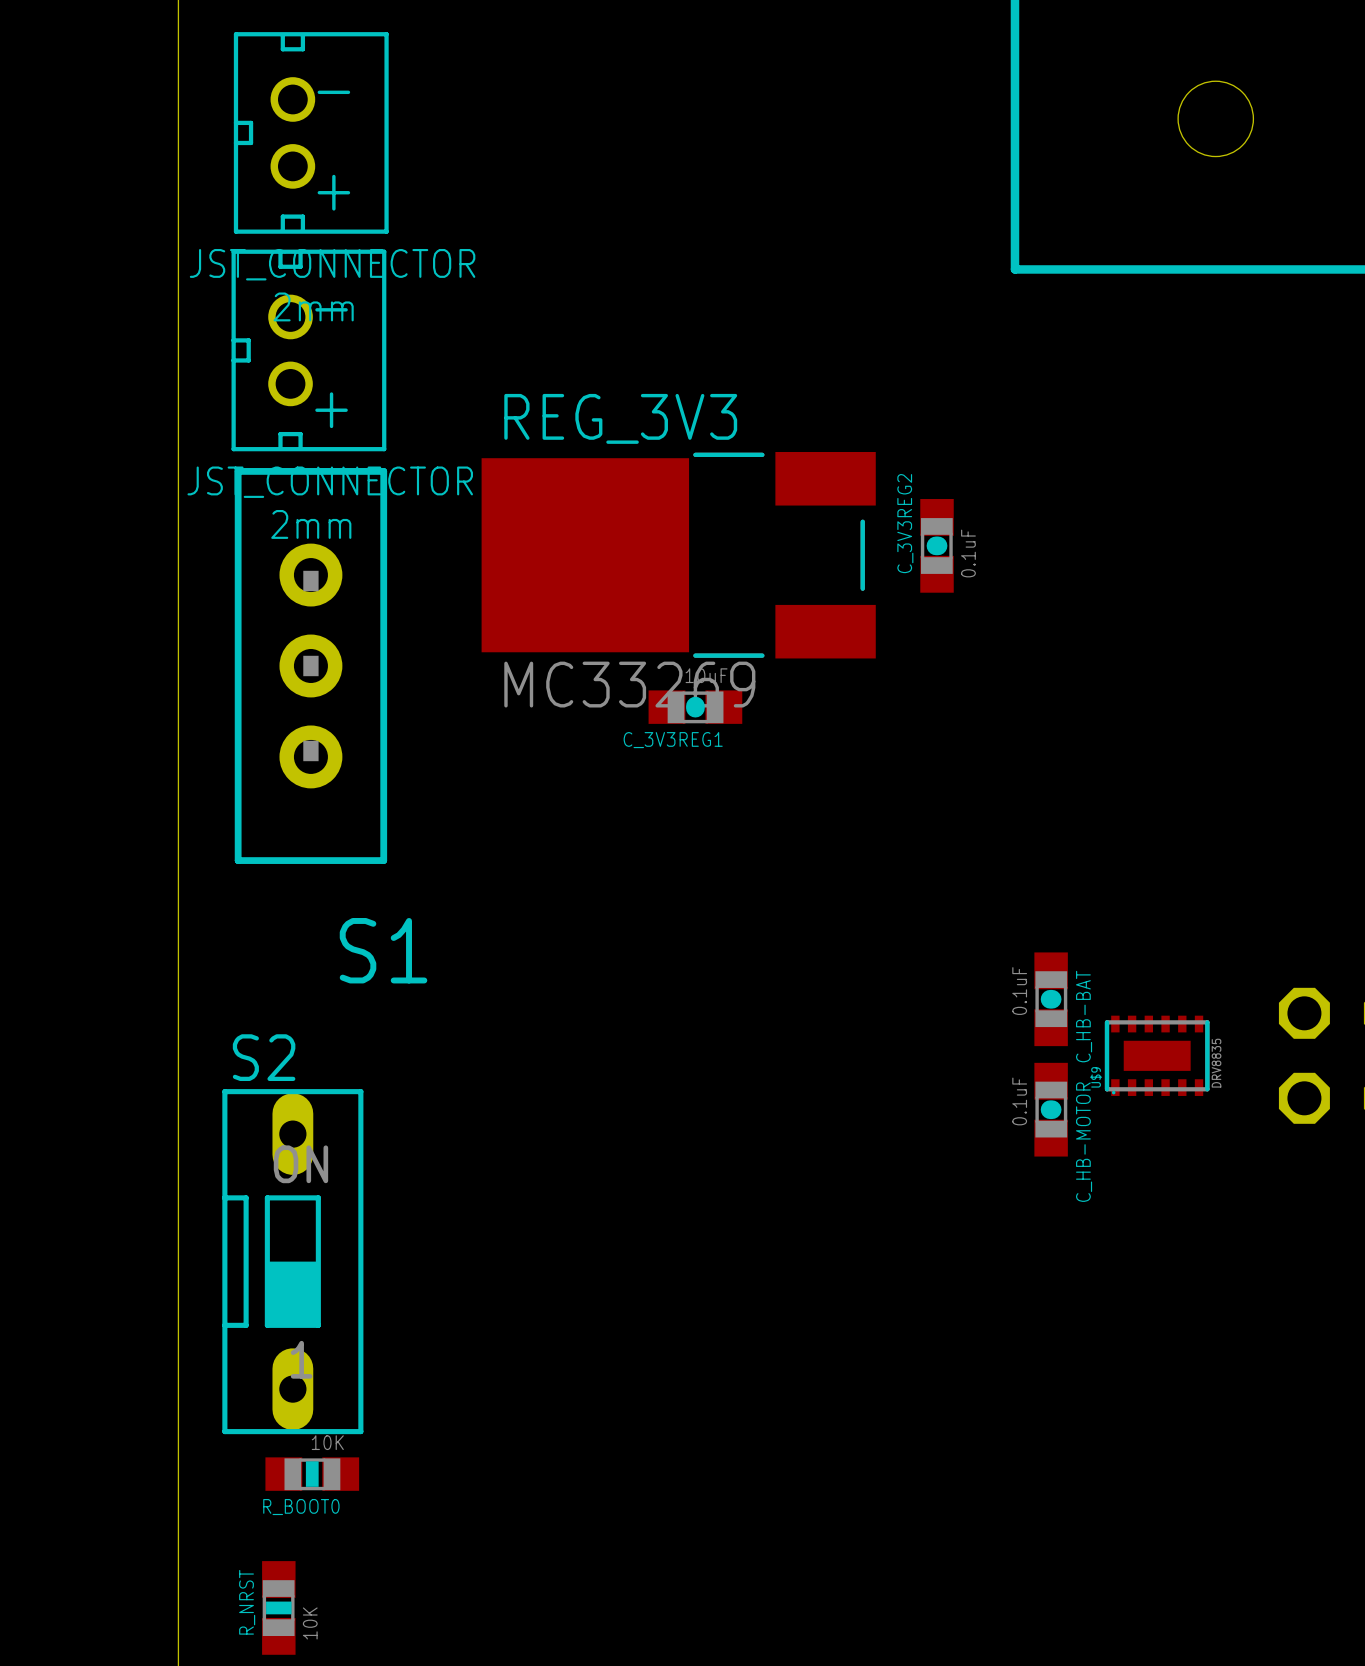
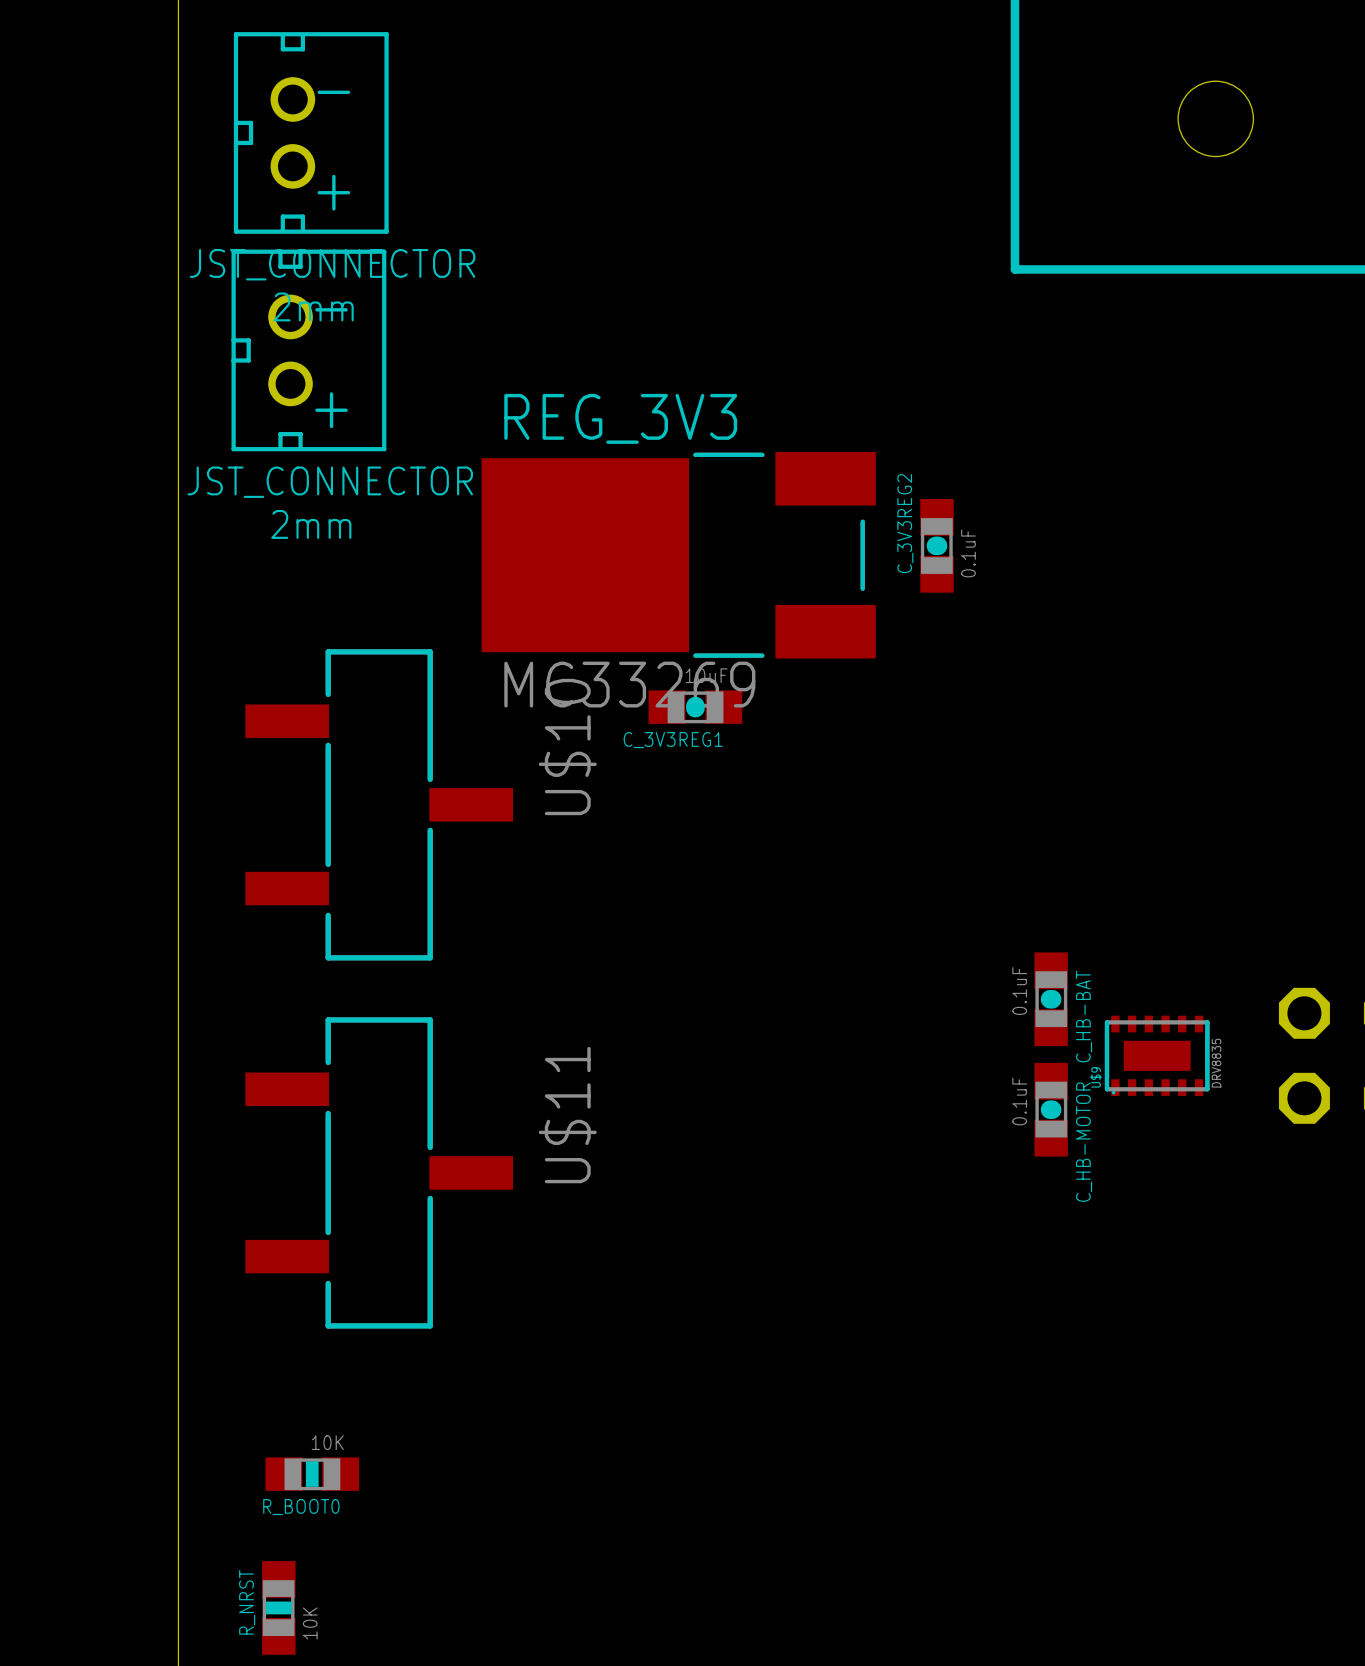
S1: (310, 665) -> none
U$10: none -> (379, 804)
U$11: none -> (379, 1172)
S2: (292, 1261) -> none

